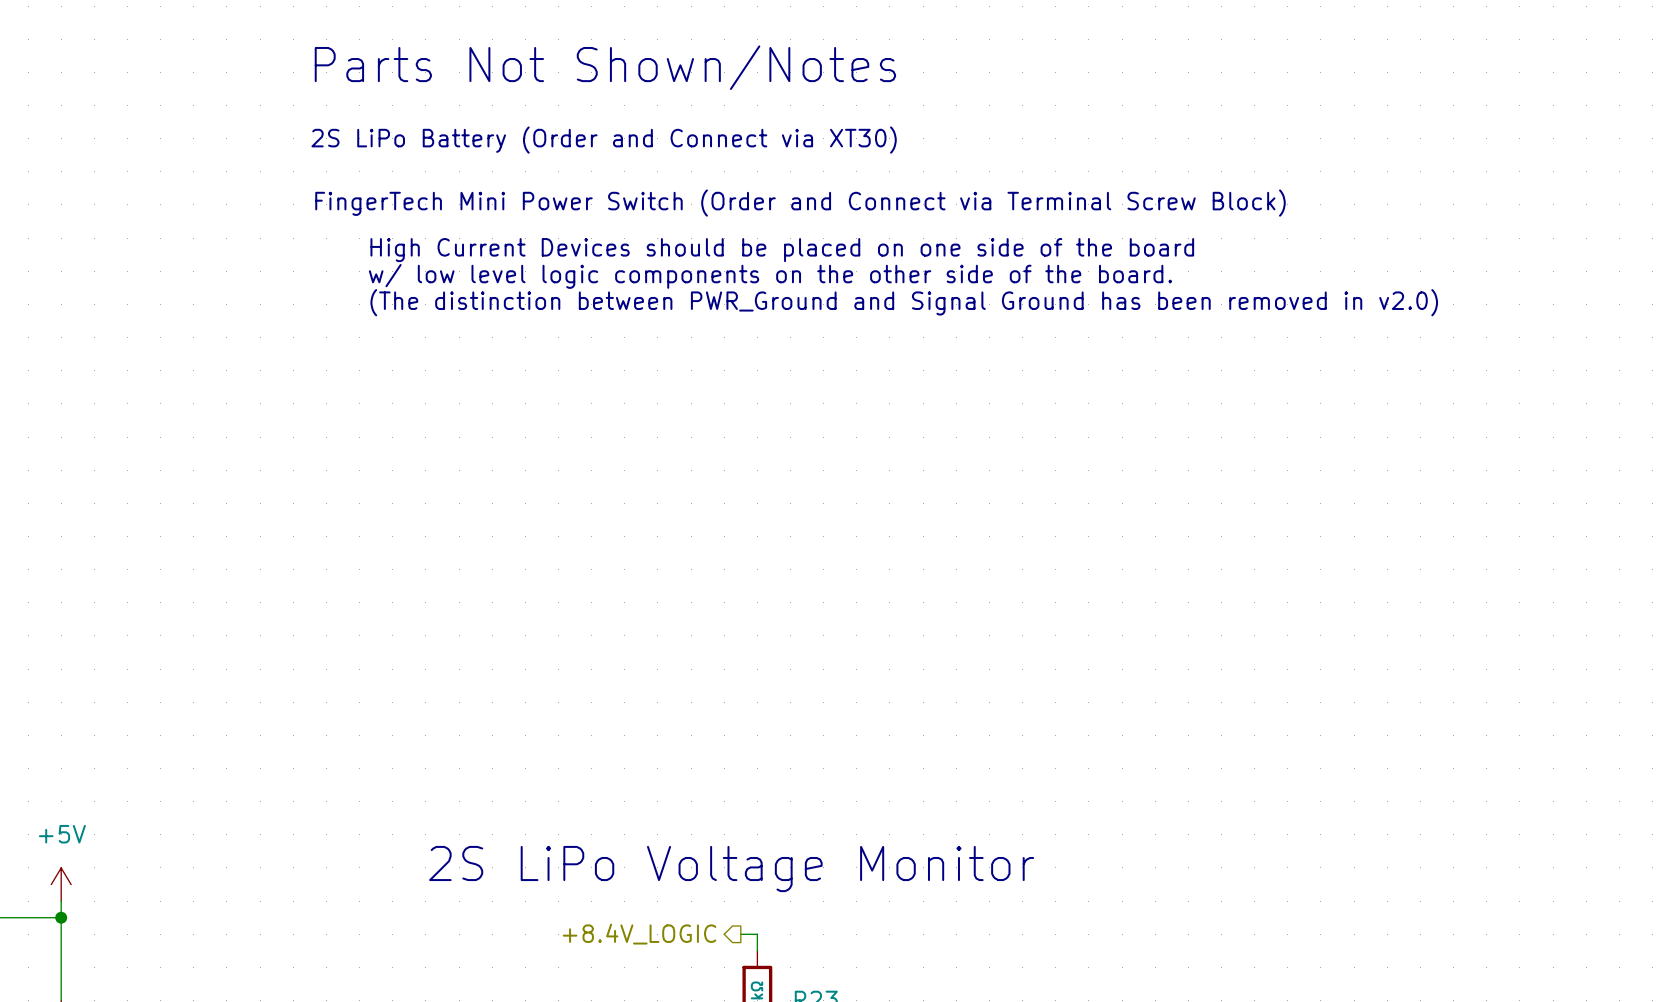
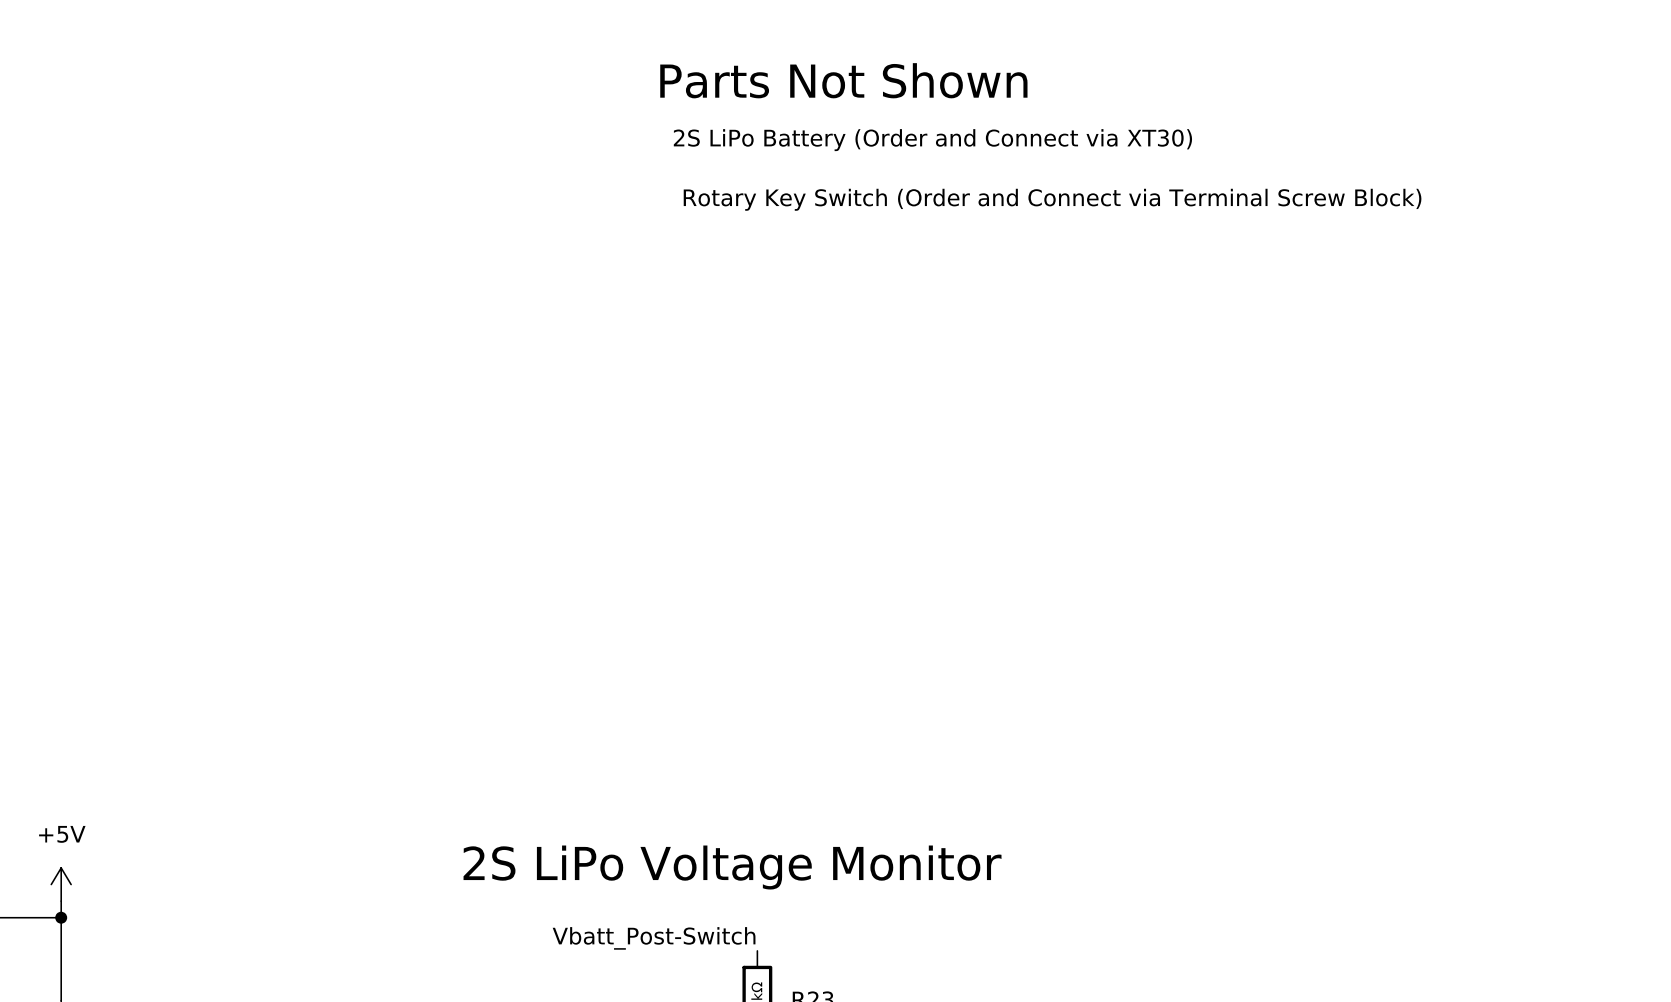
text: Parts Not Shown/Notes (605, 67) -> none
text: none -> Parts Not Shown (843, 80)
text: 2S LiPo Battery (Order and Connect via XT30) (604, 140) -> none
text: none -> 2S LiPo Battery (Order and Connect via XT30) (932, 140)
text: FingerTech Mini Power Switch (Order and Connect via Terminal Screw Block) (800, 203) -> Rotary Key Switch (Order and Connect via Terminal Screw Block) (1052, 199)
text: High Current Devices should be placed on one side of the board (782, 250) -> none
text: w/ low level logic components on the other side of the board. (770, 276) -> none
text: (The distinction between PWR_Ground and Signal Ground has been removed in v2.0) (904, 302) -> none
hierarchical label: +8.4V_LOGIC (639, 934) -> none
wire: (740, 934) (757, 934) (757, 950) -> none
label: none -> Vbatt_Post-Switch (654, 938)

